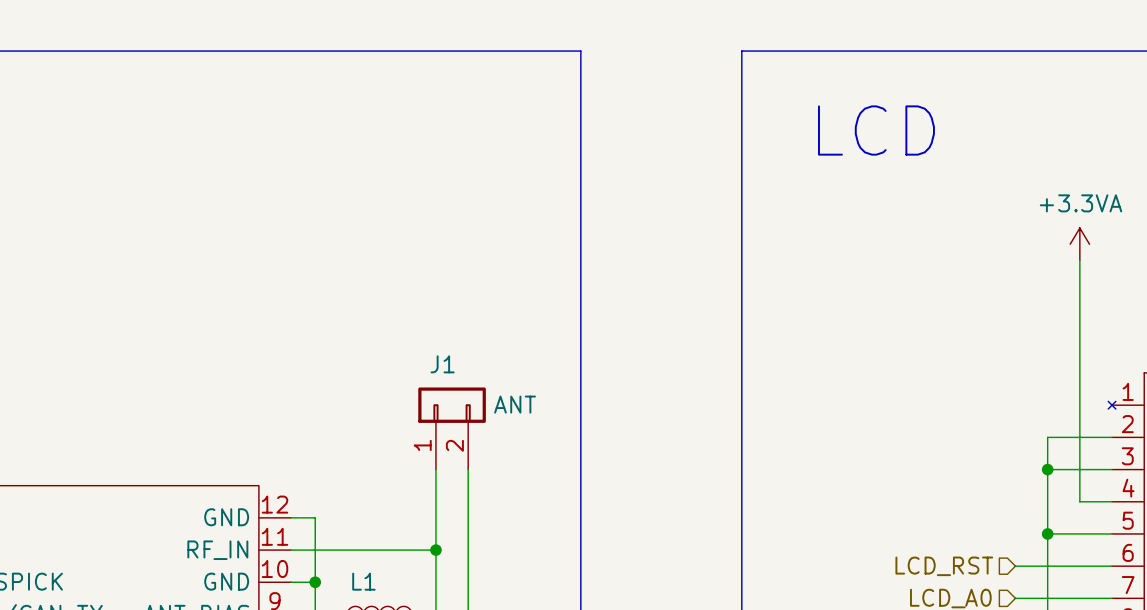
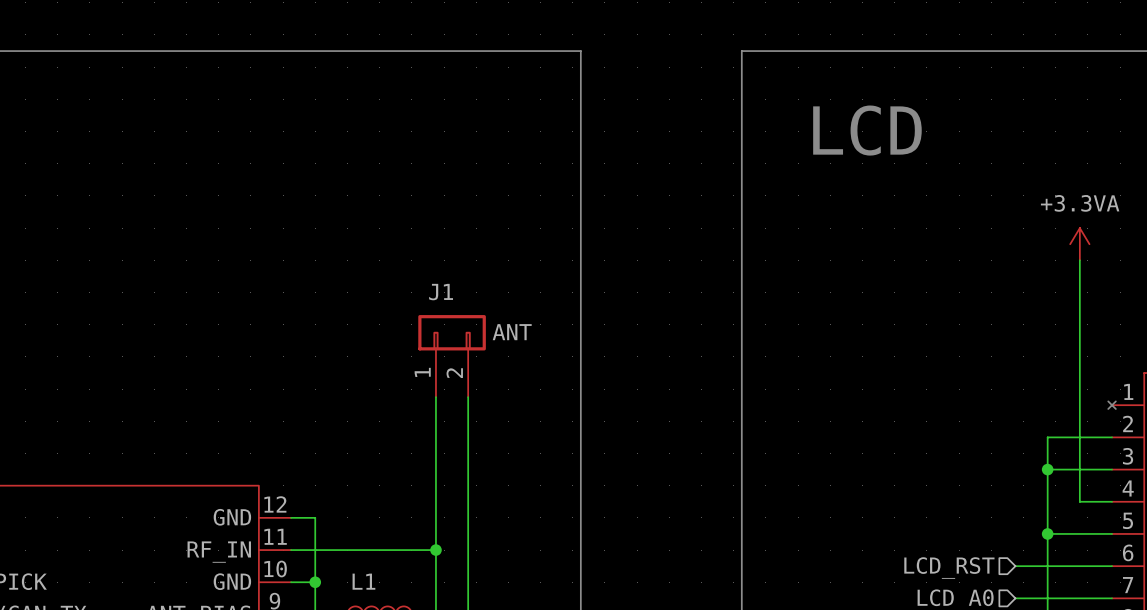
J1 position: (452, 428) -> (452, 356)

